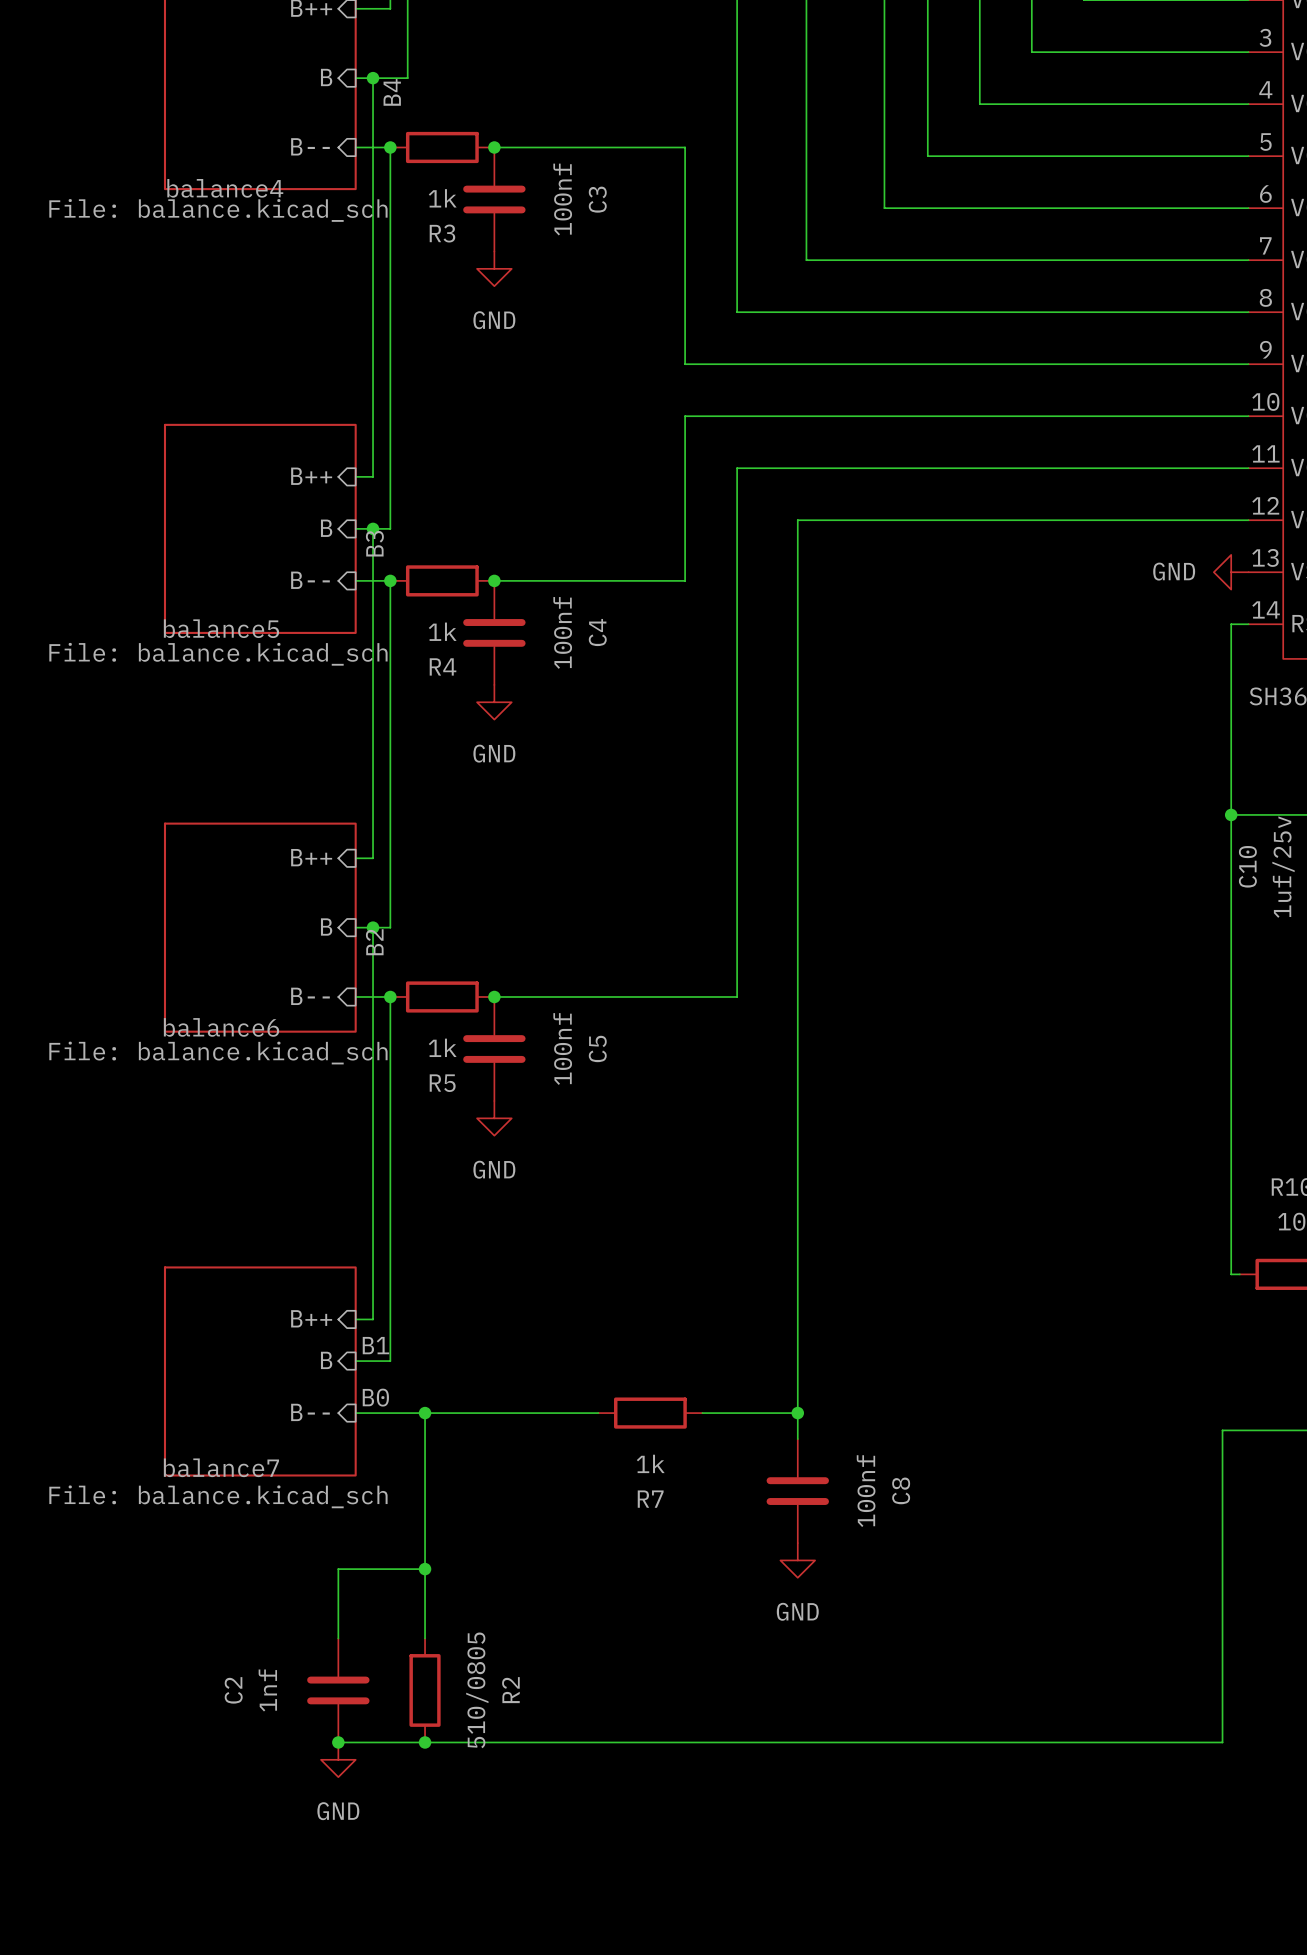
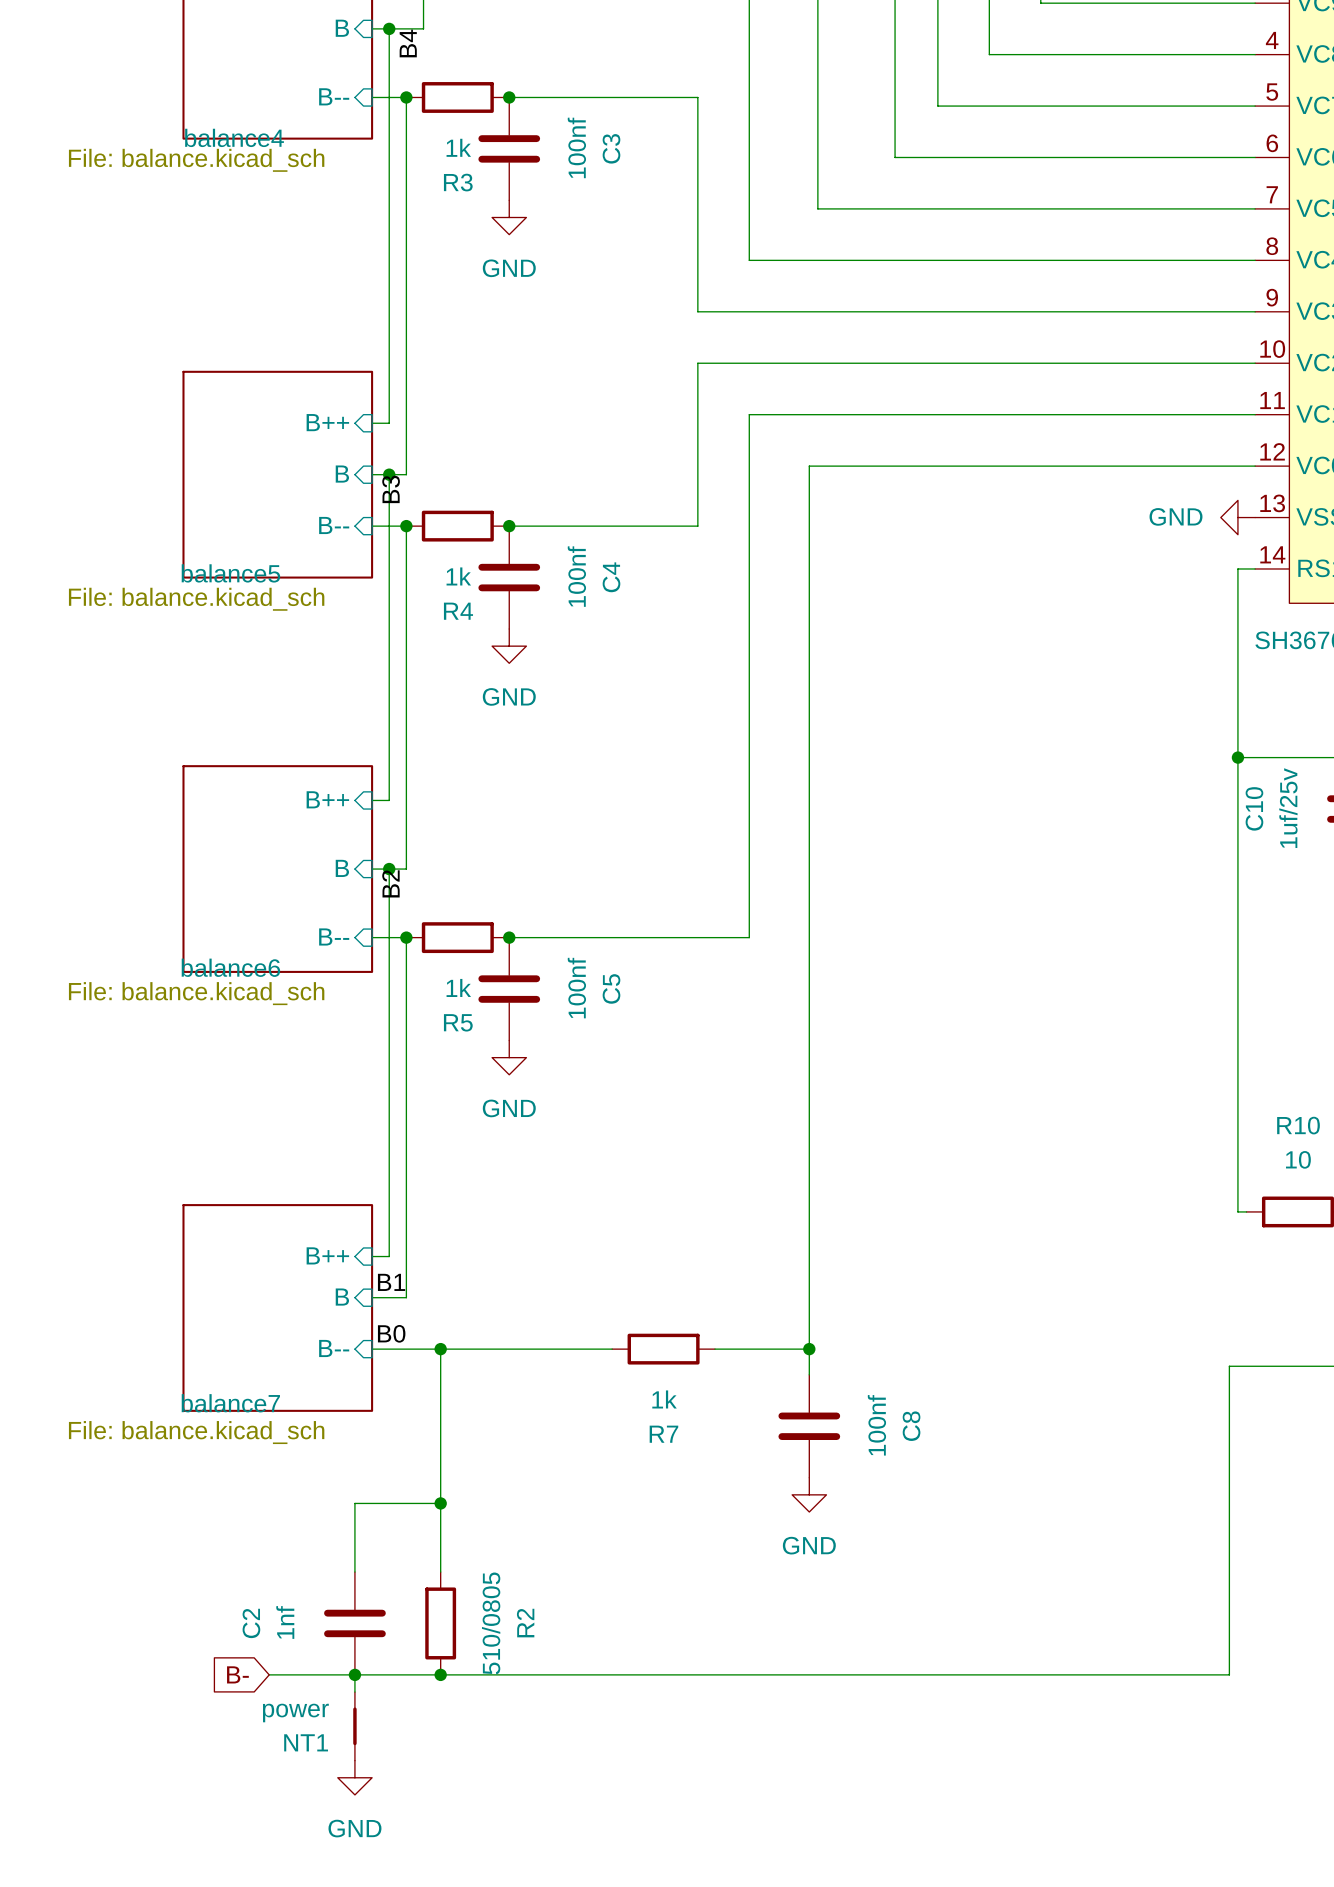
global label: none -> B- (237, 1674)
wire: none -> (269, 1674) (354, 1674) (354, 1692)
power symbol position: GND (338, 1759) -> GND (354, 1777)
NT1: none -> power (354, 1726)

